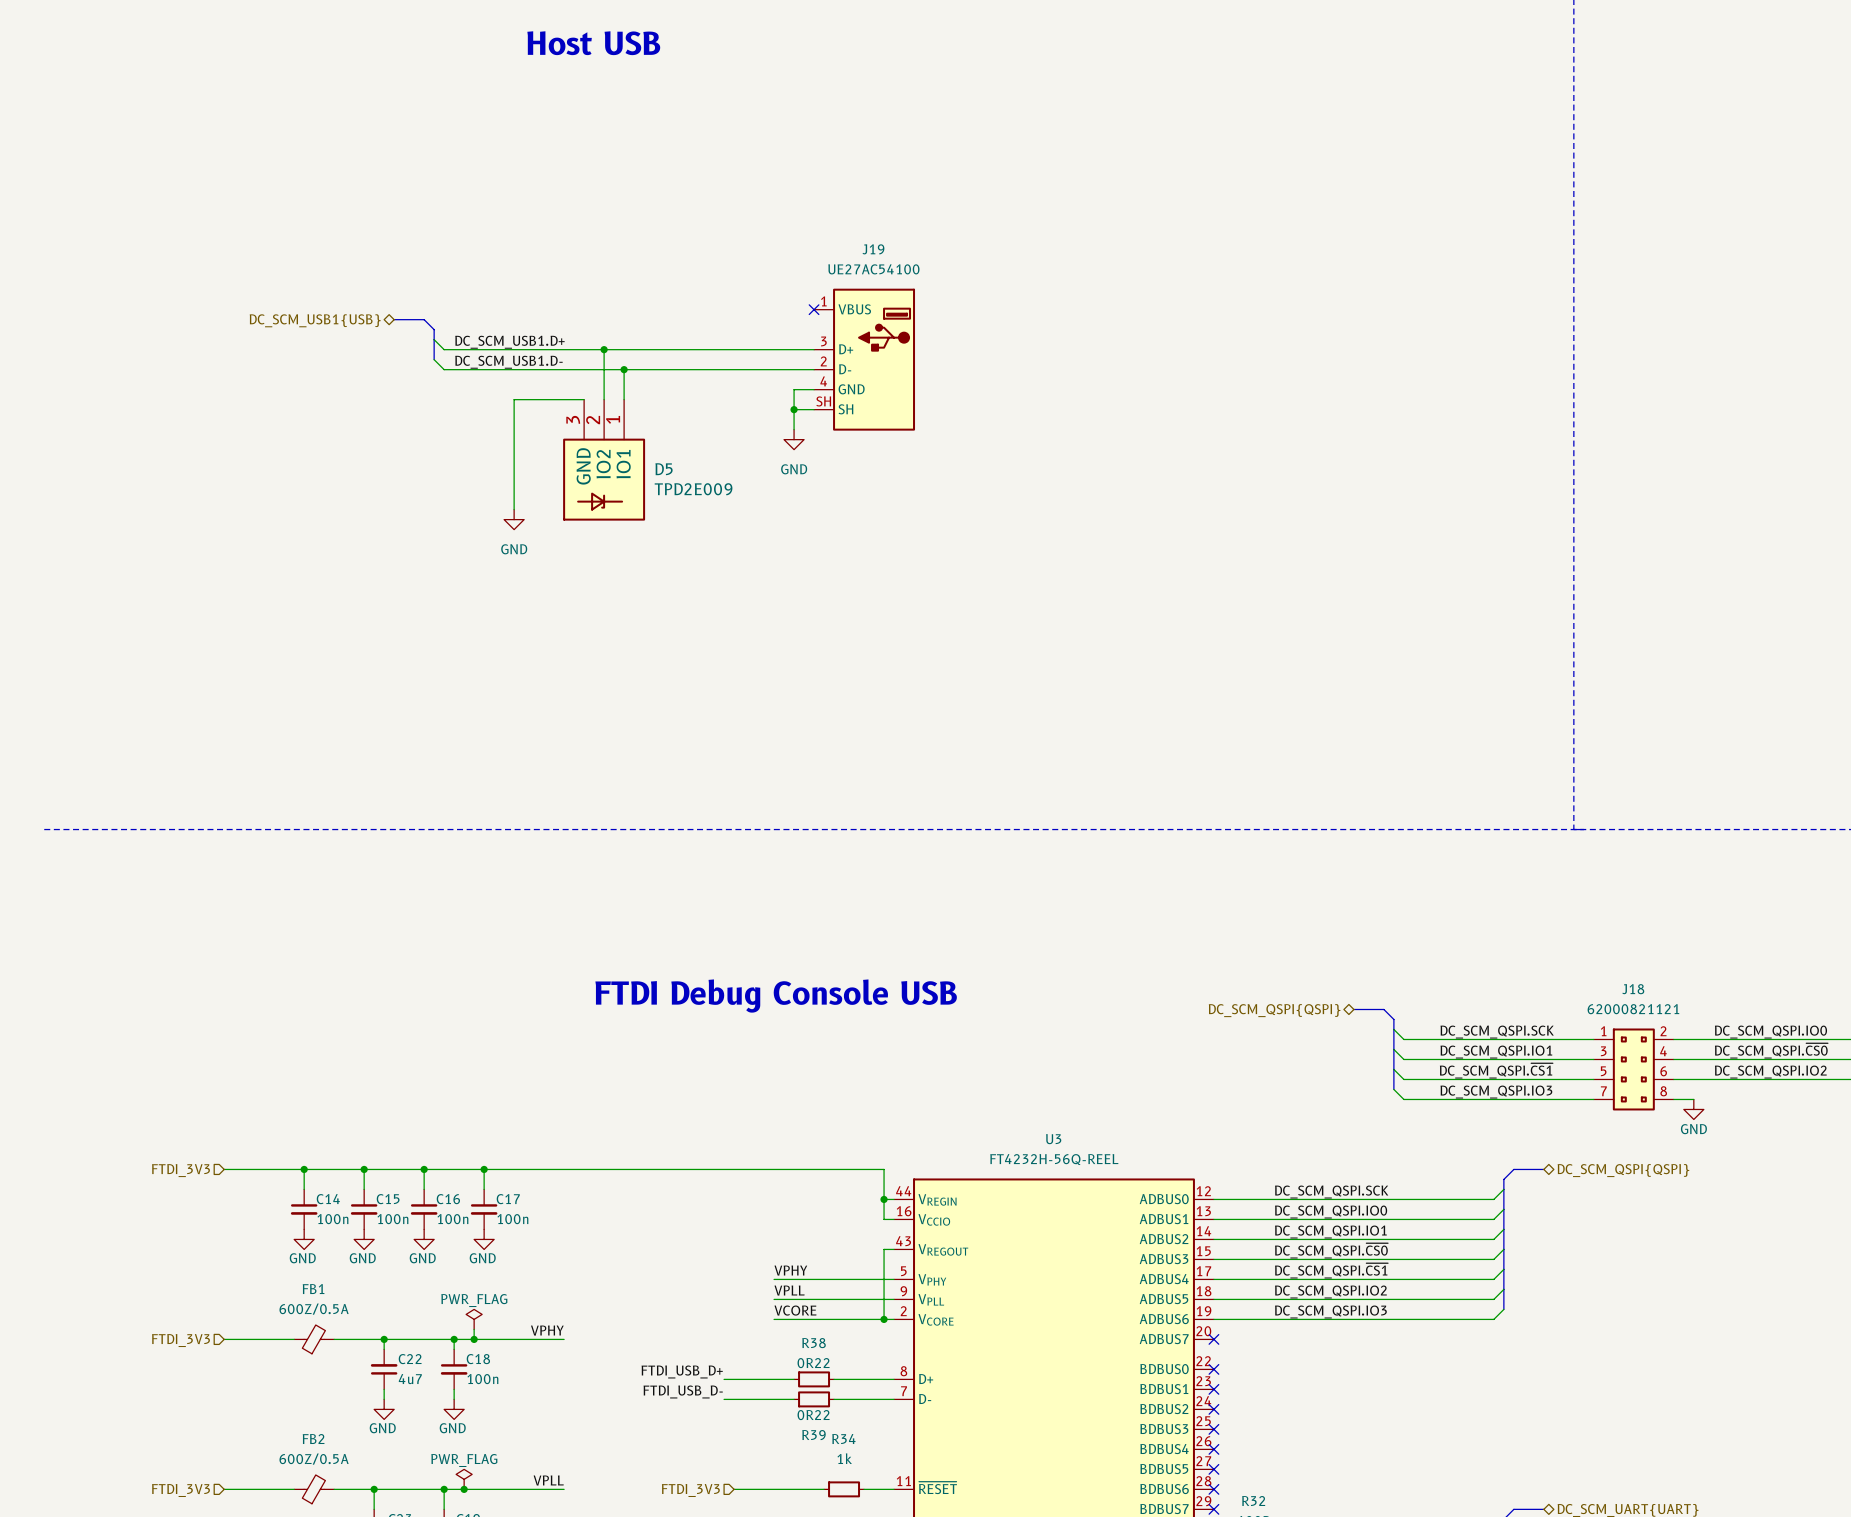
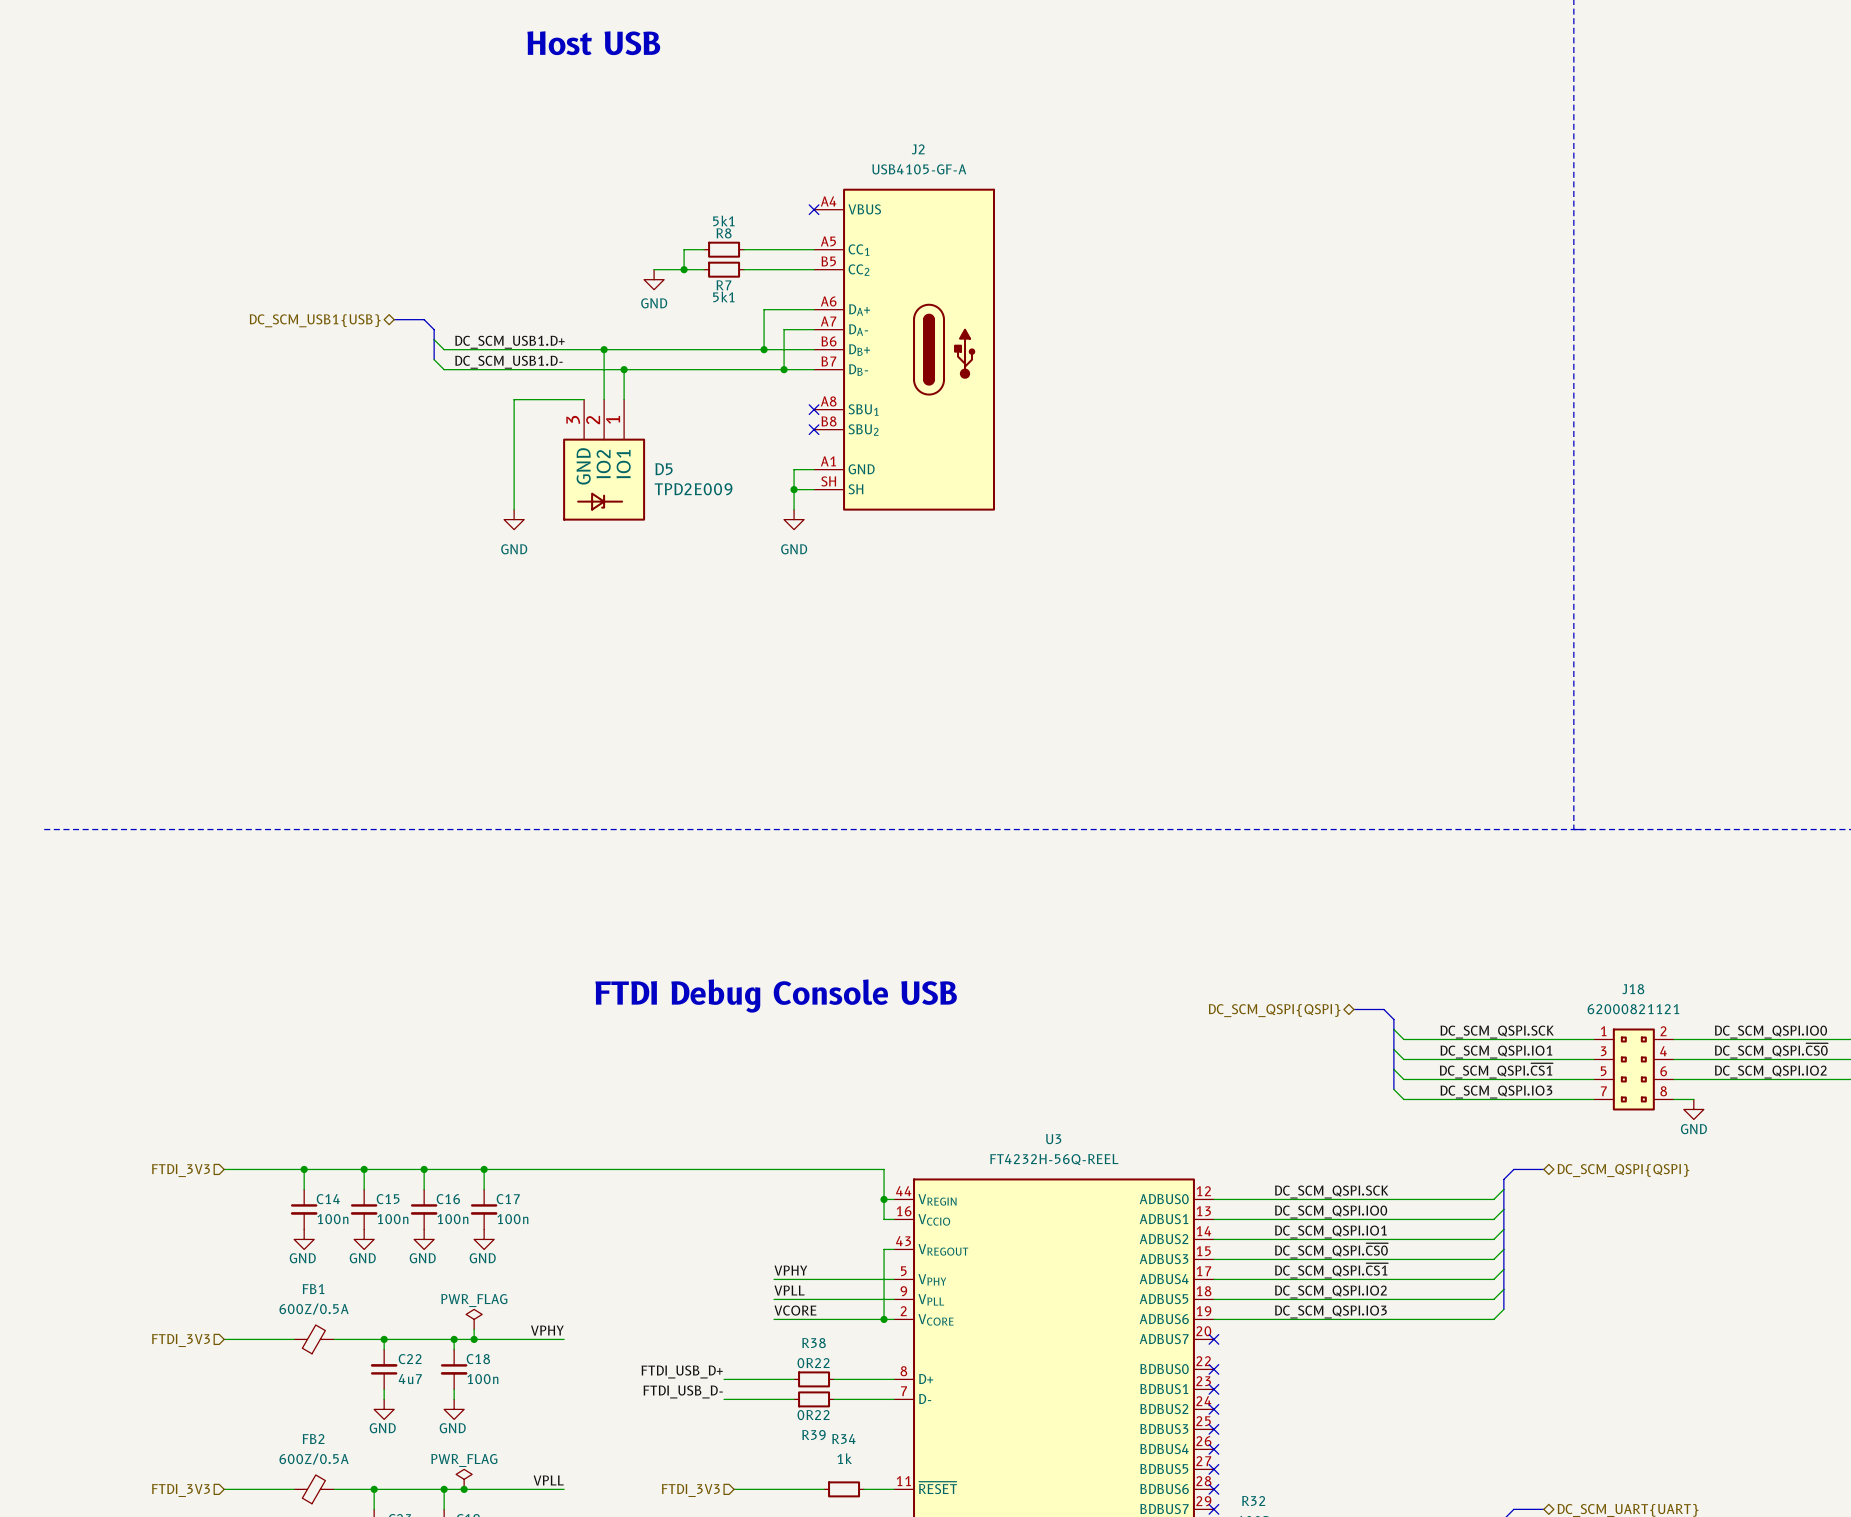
no-connect mark: none -> (814, 209)
wire: none -> (704, 249) (684, 249) (684, 269)
R7: none -> (724, 249)
wire: none -> (744, 249) (814, 249)
wire: none -> (654, 269) (704, 269)
junction: none -> (684, 269)
R8: none -> (724, 269)
wire: none -> (744, 269) (814, 269)
power symbol: none -> GND (654, 279)
wire: none -> (814, 309) (764, 309) (764, 349)
no-connect mark: (814, 309) -> none
wire: none -> (814, 329) (784, 329) (784, 369)
junction: none -> (764, 349)
J2: none -> (904, 349)
J19: (864, 359) -> none
junction: none -> (784, 369)
wire: (814, 389) (794, 389) (794, 429) -> (814, 469) (794, 469) (794, 509)
wire: (794, 409) (814, 409) -> (794, 489) (814, 489)
junction: (794, 409) -> none
no-connect mark: none -> (814, 409)
no-connect mark: none -> (814, 429)
power symbol position: GND (794, 439) -> GND (794, 519)
junction: none -> (794, 489)

